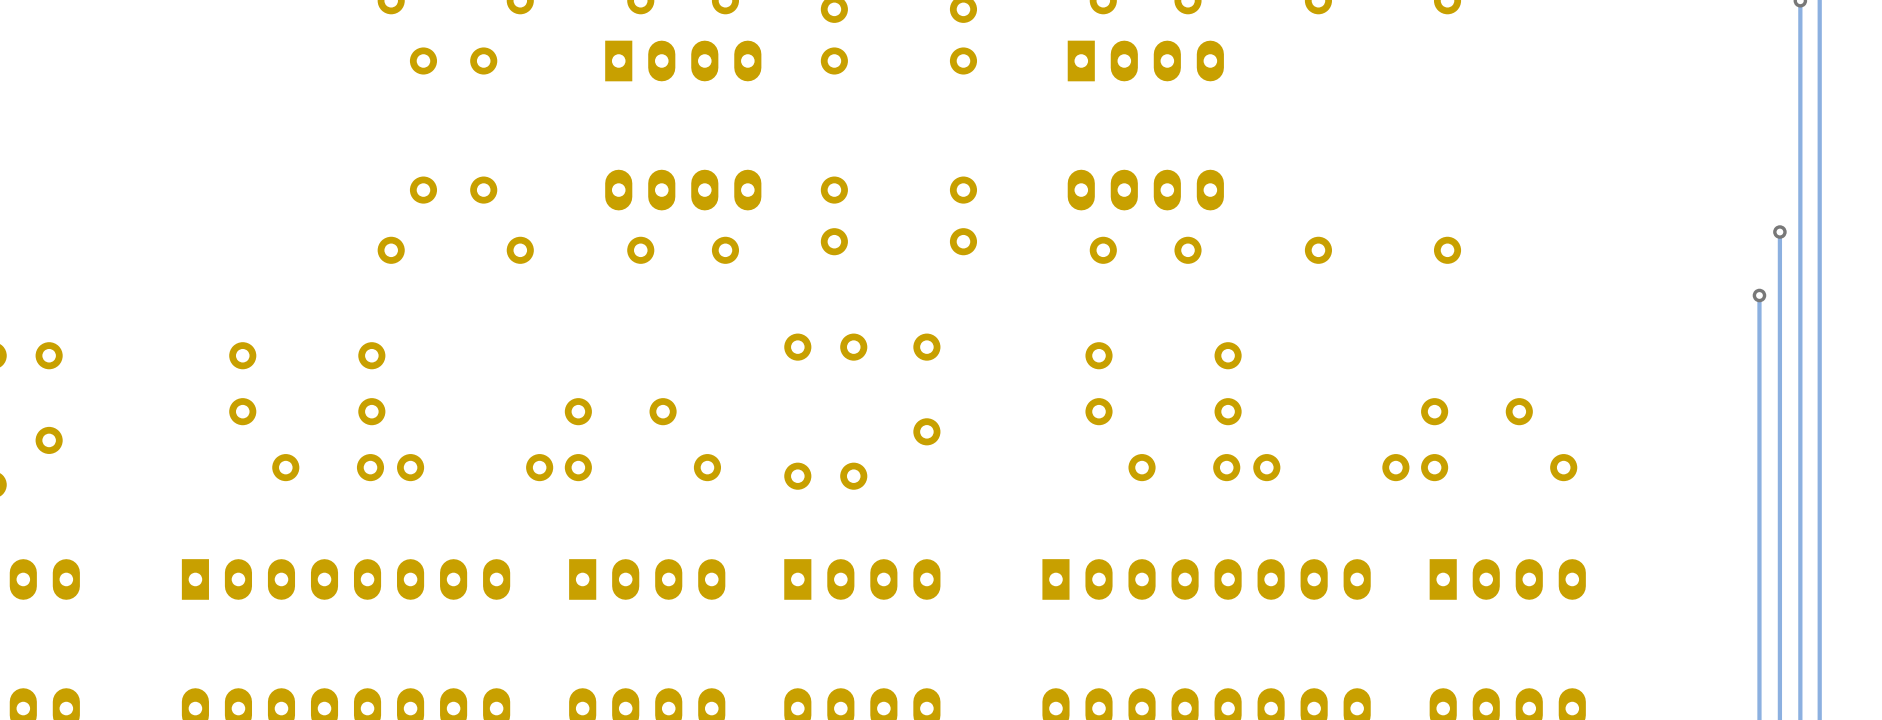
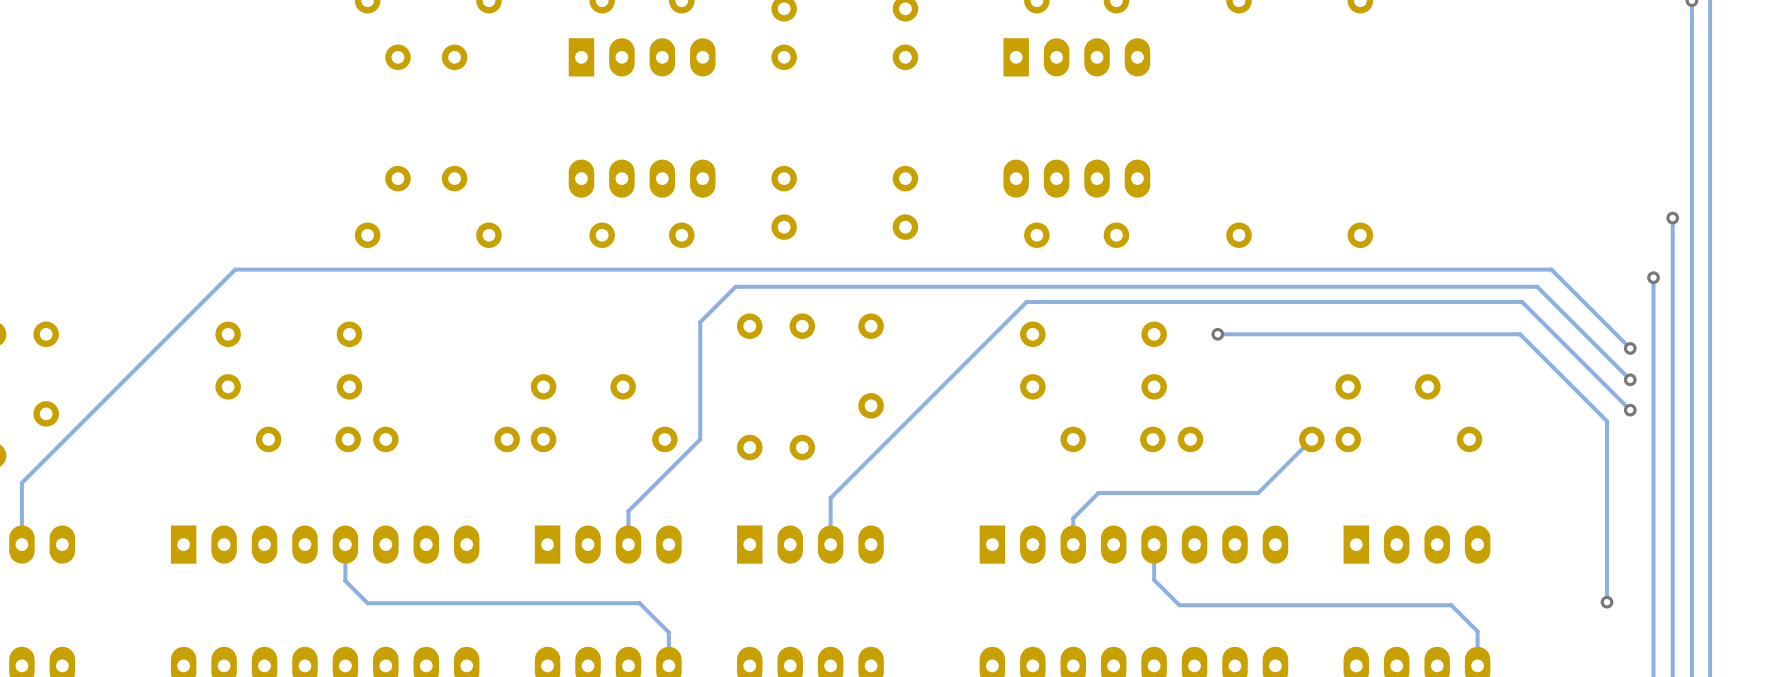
track: none -> (1217, 334) (1520, 334) (1607, 421) (1607, 602)
via: none -> (1217, 334)
track: none -> (1630, 348) (1551, 269) (235, 269) (21, 482) (21, 544)
via: none -> (1630, 348)
track: none -> (1630, 379) (1537, 286) (735, 286) (700, 322) (700, 439) (628, 511) (628, 544)
via: none -> (1630, 379)
track: none -> (1630, 410) (1522, 301) (1026, 301) (830, 498) (830, 544)
via: none -> (1630, 410)
track: none -> (1311, 439) (1258, 493) (1098, 493) (1073, 518) (1073, 544)
track: none -> (345, 544) (345, 580) (367, 603) (639, 603) (668, 632) (668, 665)
track: none -> (1154, 544) (1154, 579) (1179, 605) (1451, 605) (1477, 631) (1477, 665)
via: none -> (1607, 602)

